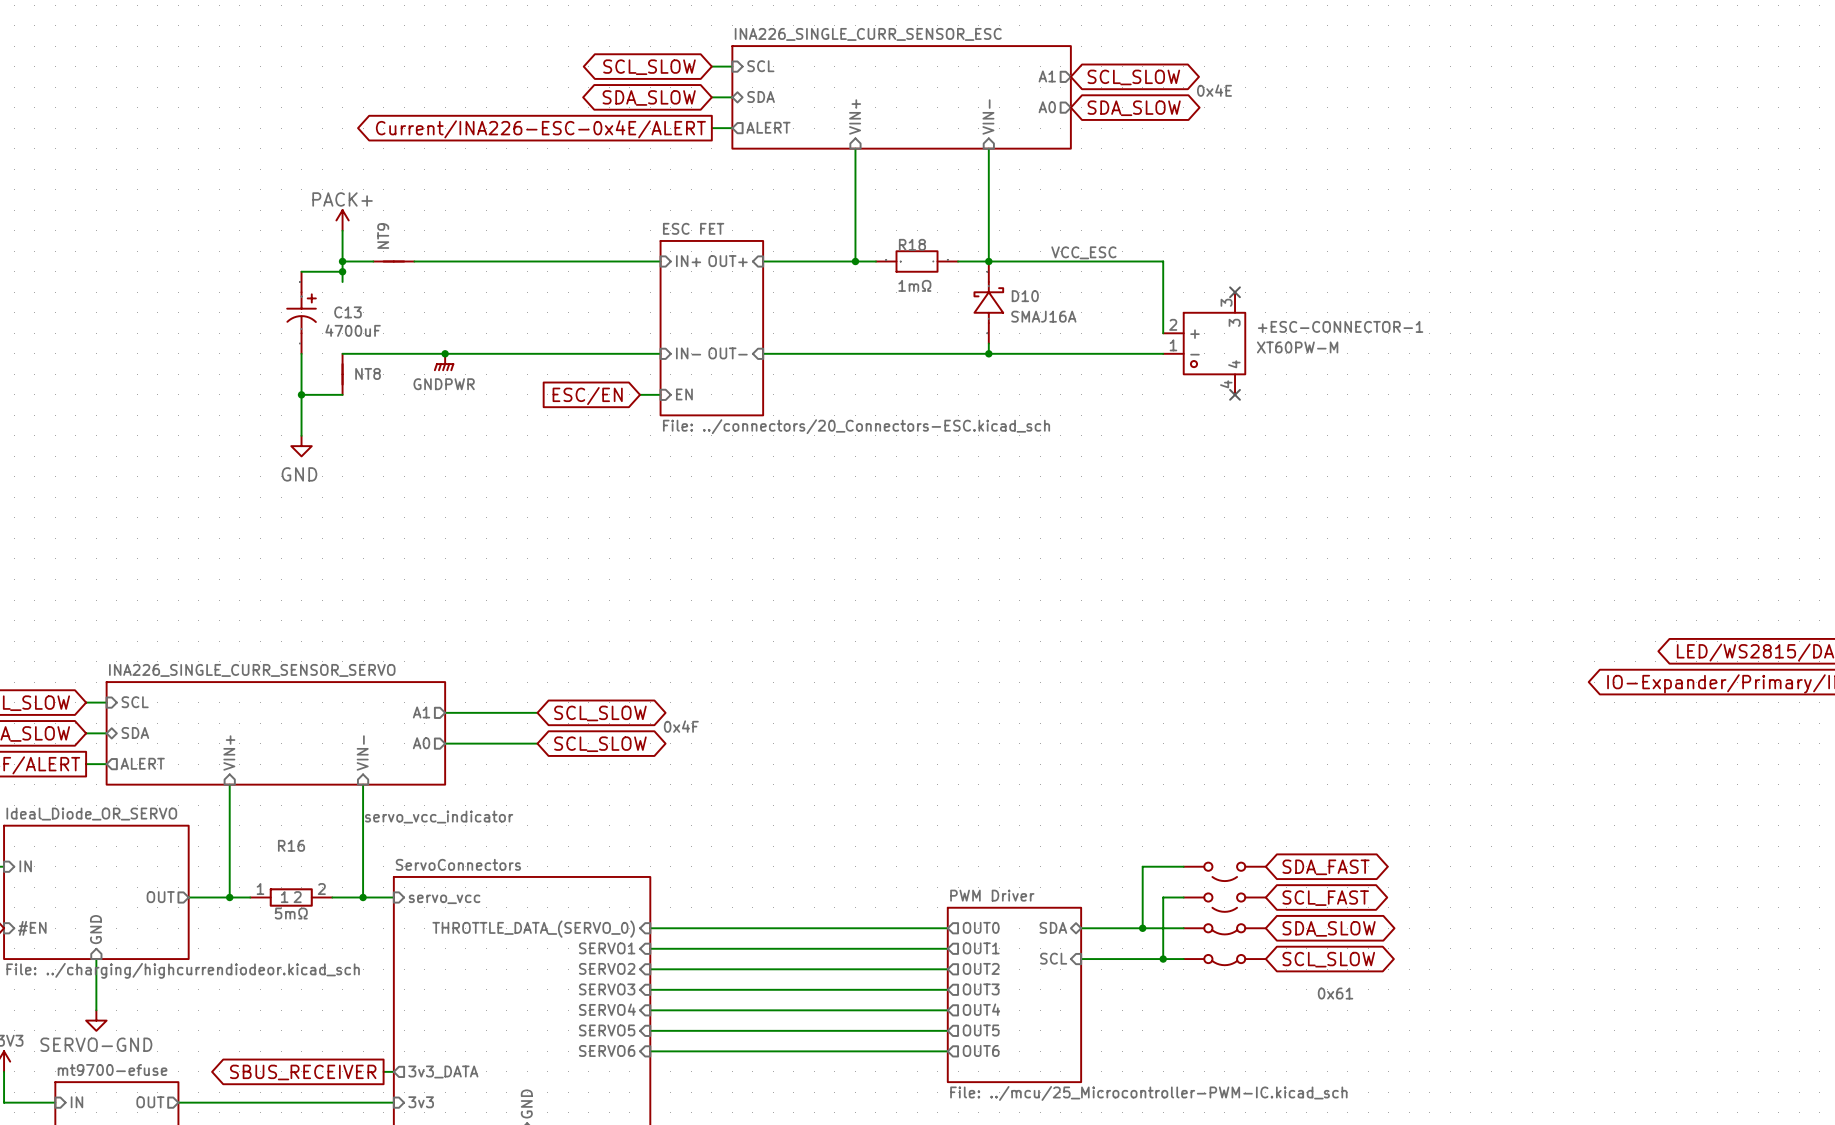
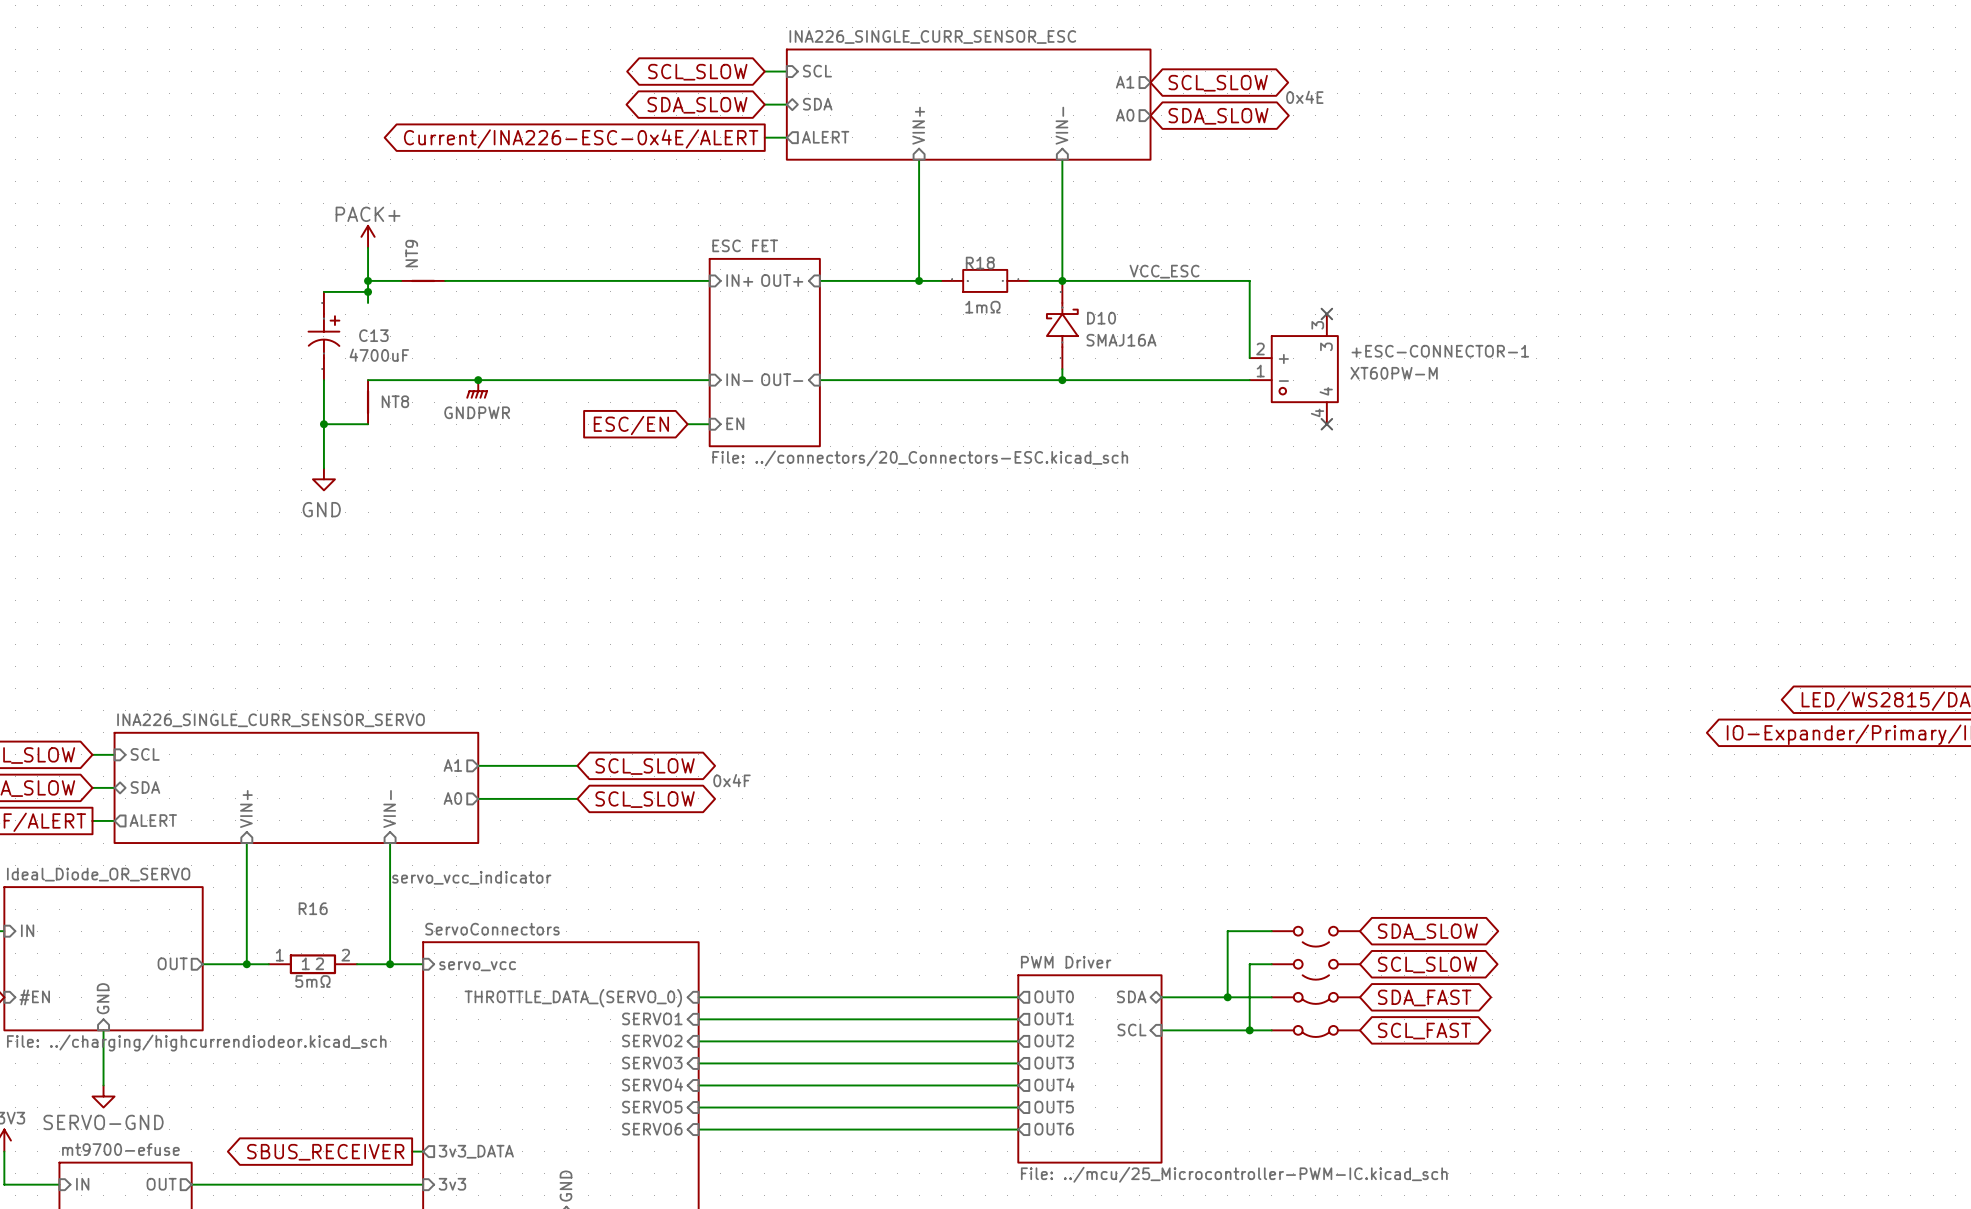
global label: SDA_FAST (1326, 867) -> SDA_SLOW (1427, 931)
global label: SCL_FAST (1325, 898) -> SCL_SLOW (1427, 964)
global label: SDA_SLOW (1329, 928) -> SDA_FAST (1424, 997)
global label: SCL_SLOW (1328, 959) -> SCL_FAST (1424, 1031)
sheet PWM Driver text: 0x61 (1335, 993) -> none

